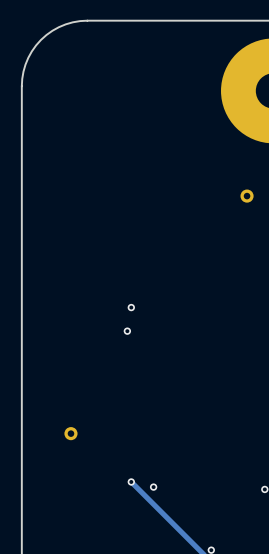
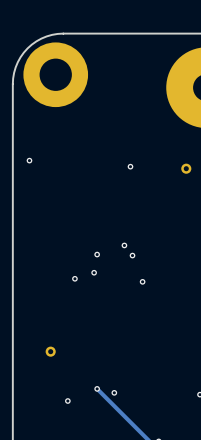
part: none -> (55, 74)
via: none -> (29, 160)
via: none -> (130, 166)
via: none -> (124, 245)
via: none -> (132, 255)
via: none -> (74, 278)
via: none -> (142, 281)
via: none -> (67, 401)

